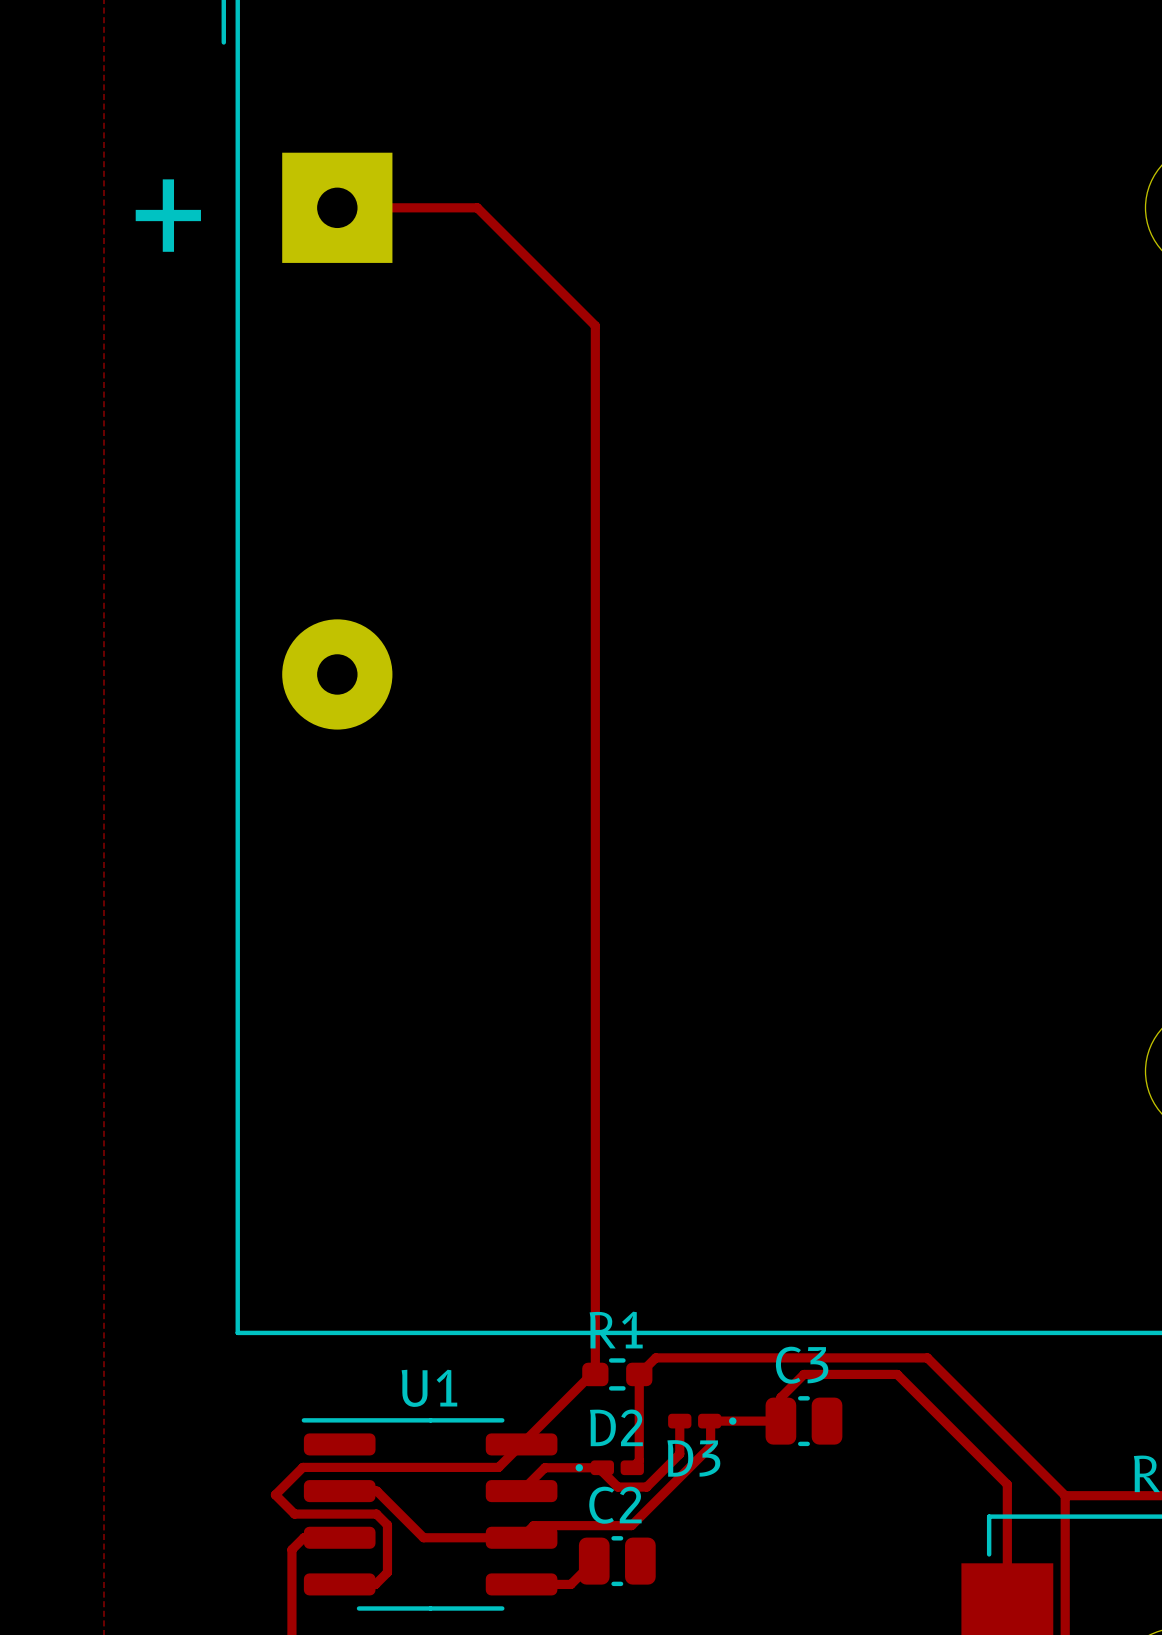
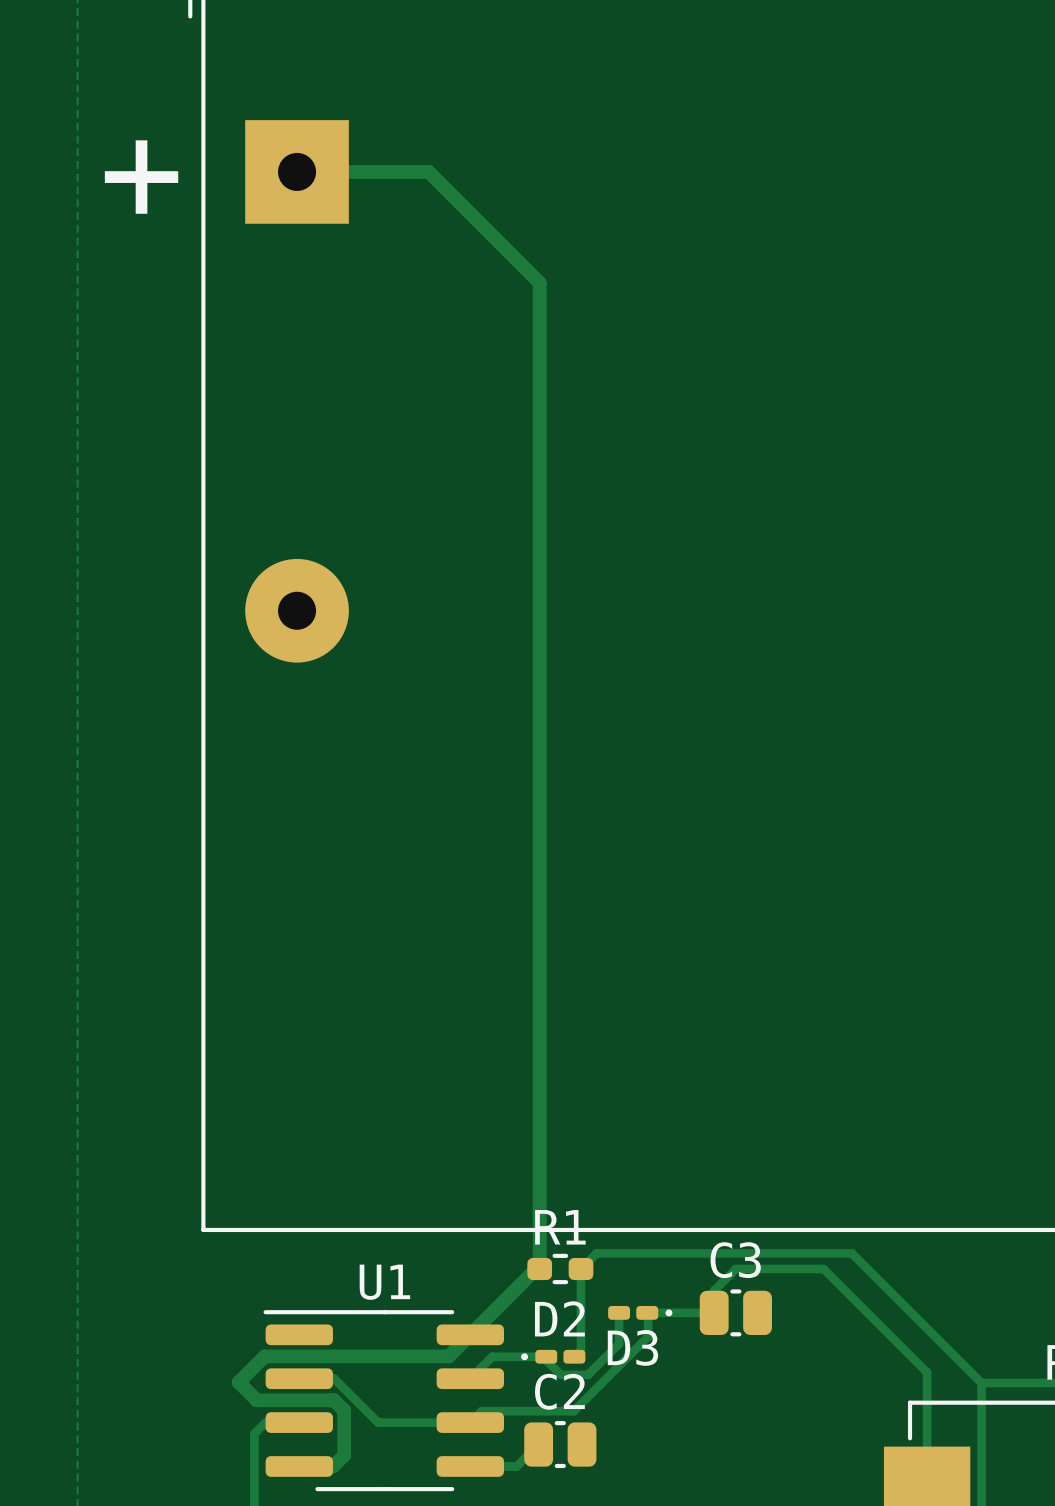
track width: thin (337, 207) (477, 207) (595, 325) (595, 1374) -> thick (297, 171) (428, 171) (539, 282) (539, 1269)
track width: thin (591, 1374) (498, 1467) (302, 1467) (275, 1494) (294, 1514) (376, 1514) (387, 1525) (387, 1572) (375, 1584) (339, 1584) -> thick (536, 1269) (448, 1356) (264, 1356) (238, 1382) (256, 1400) (333, 1400) (344, 1410) (344, 1455) (332, 1466) (299, 1466)

